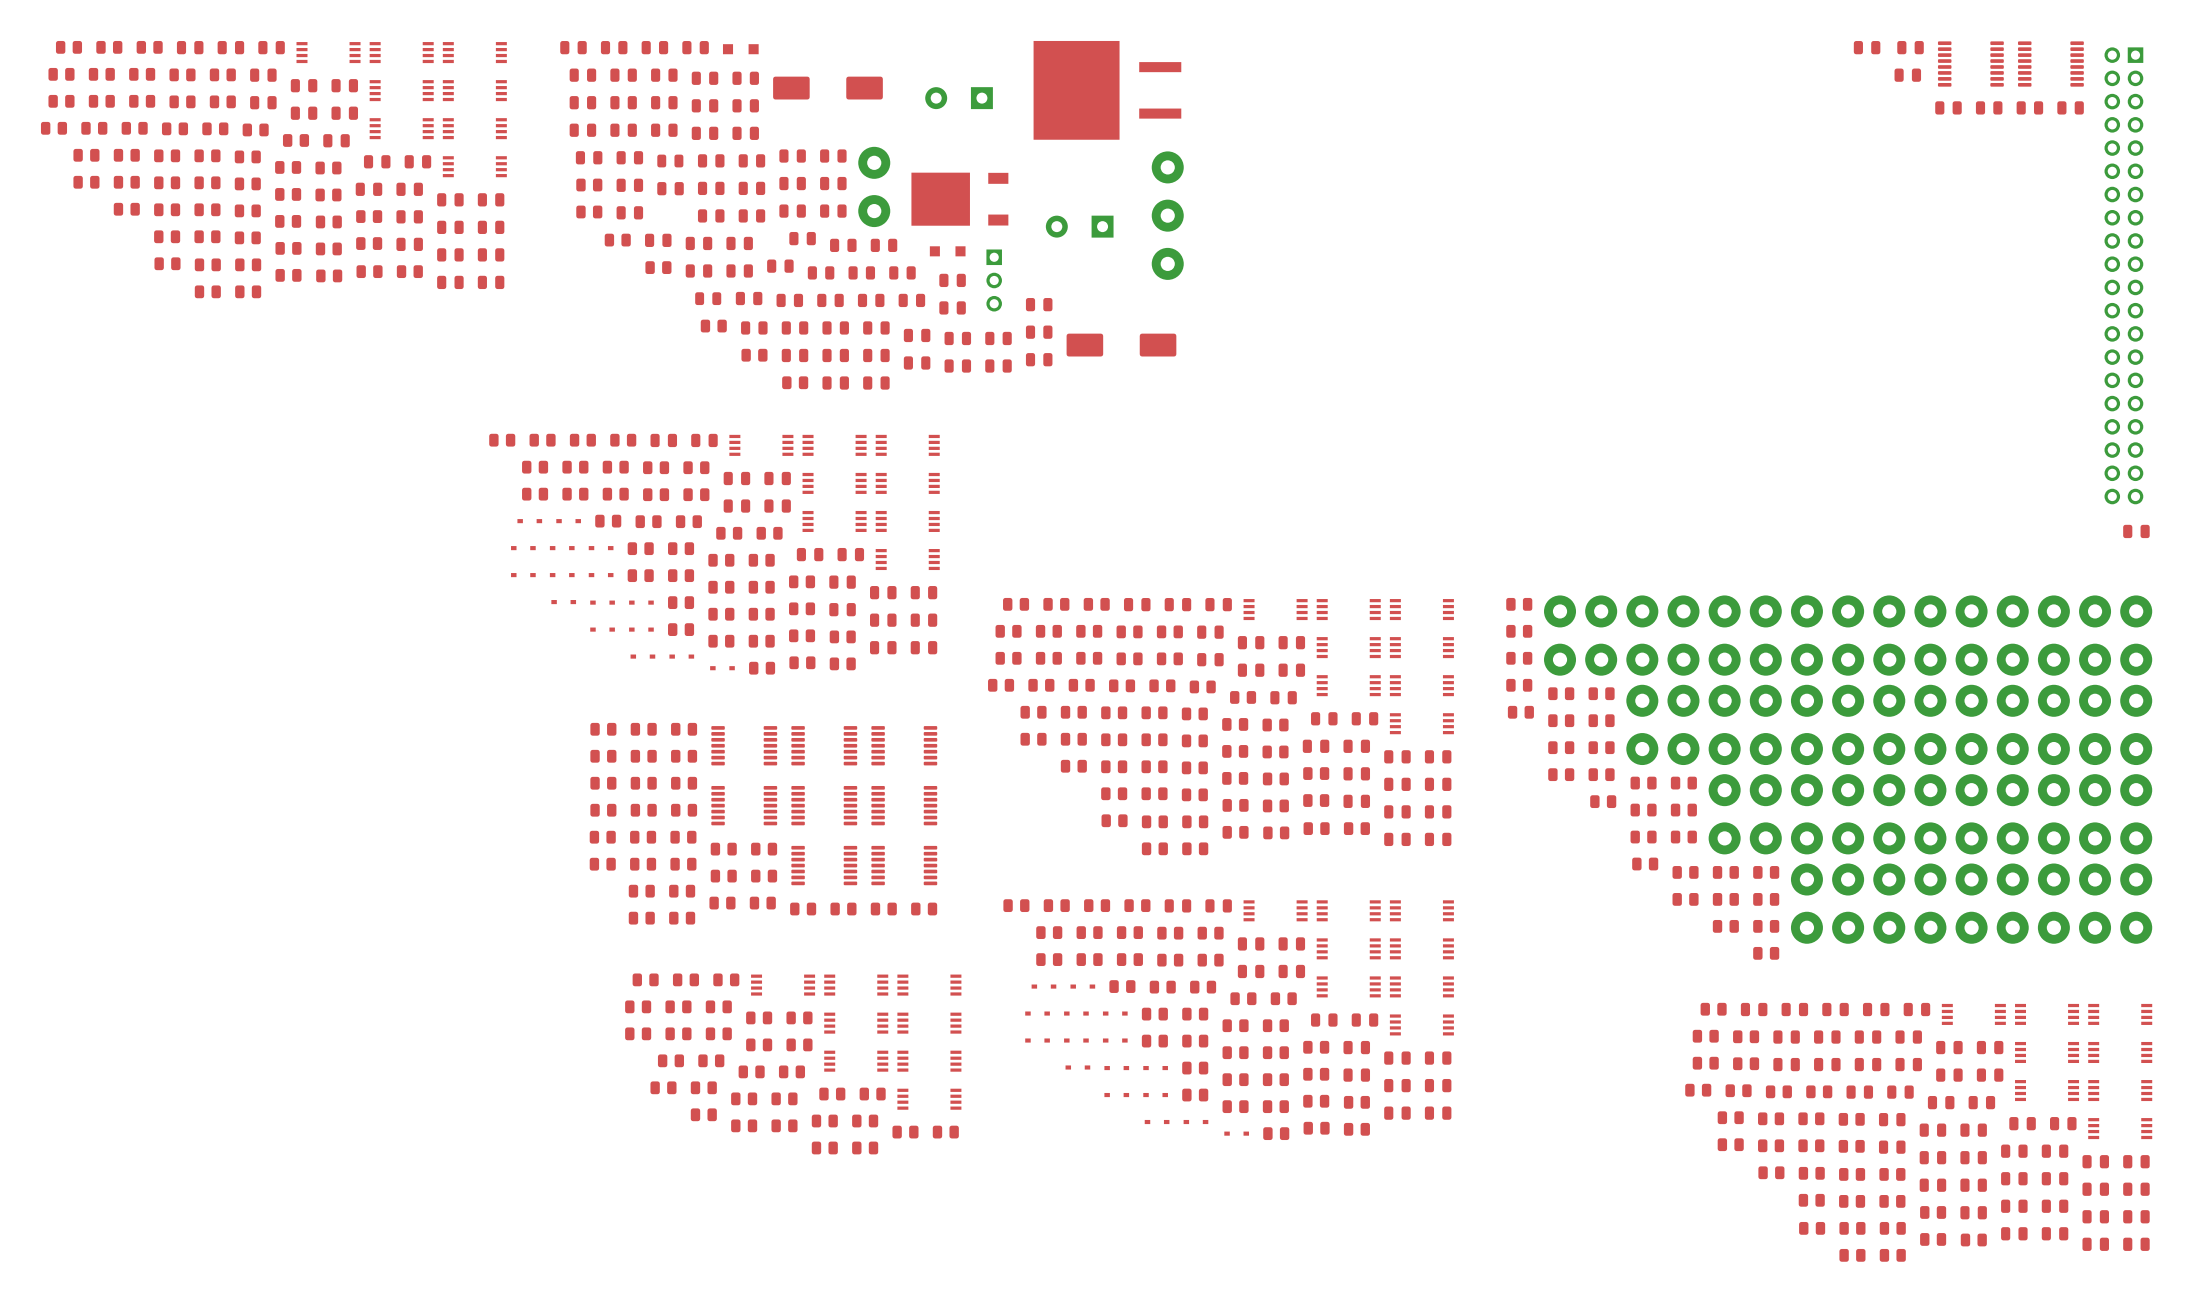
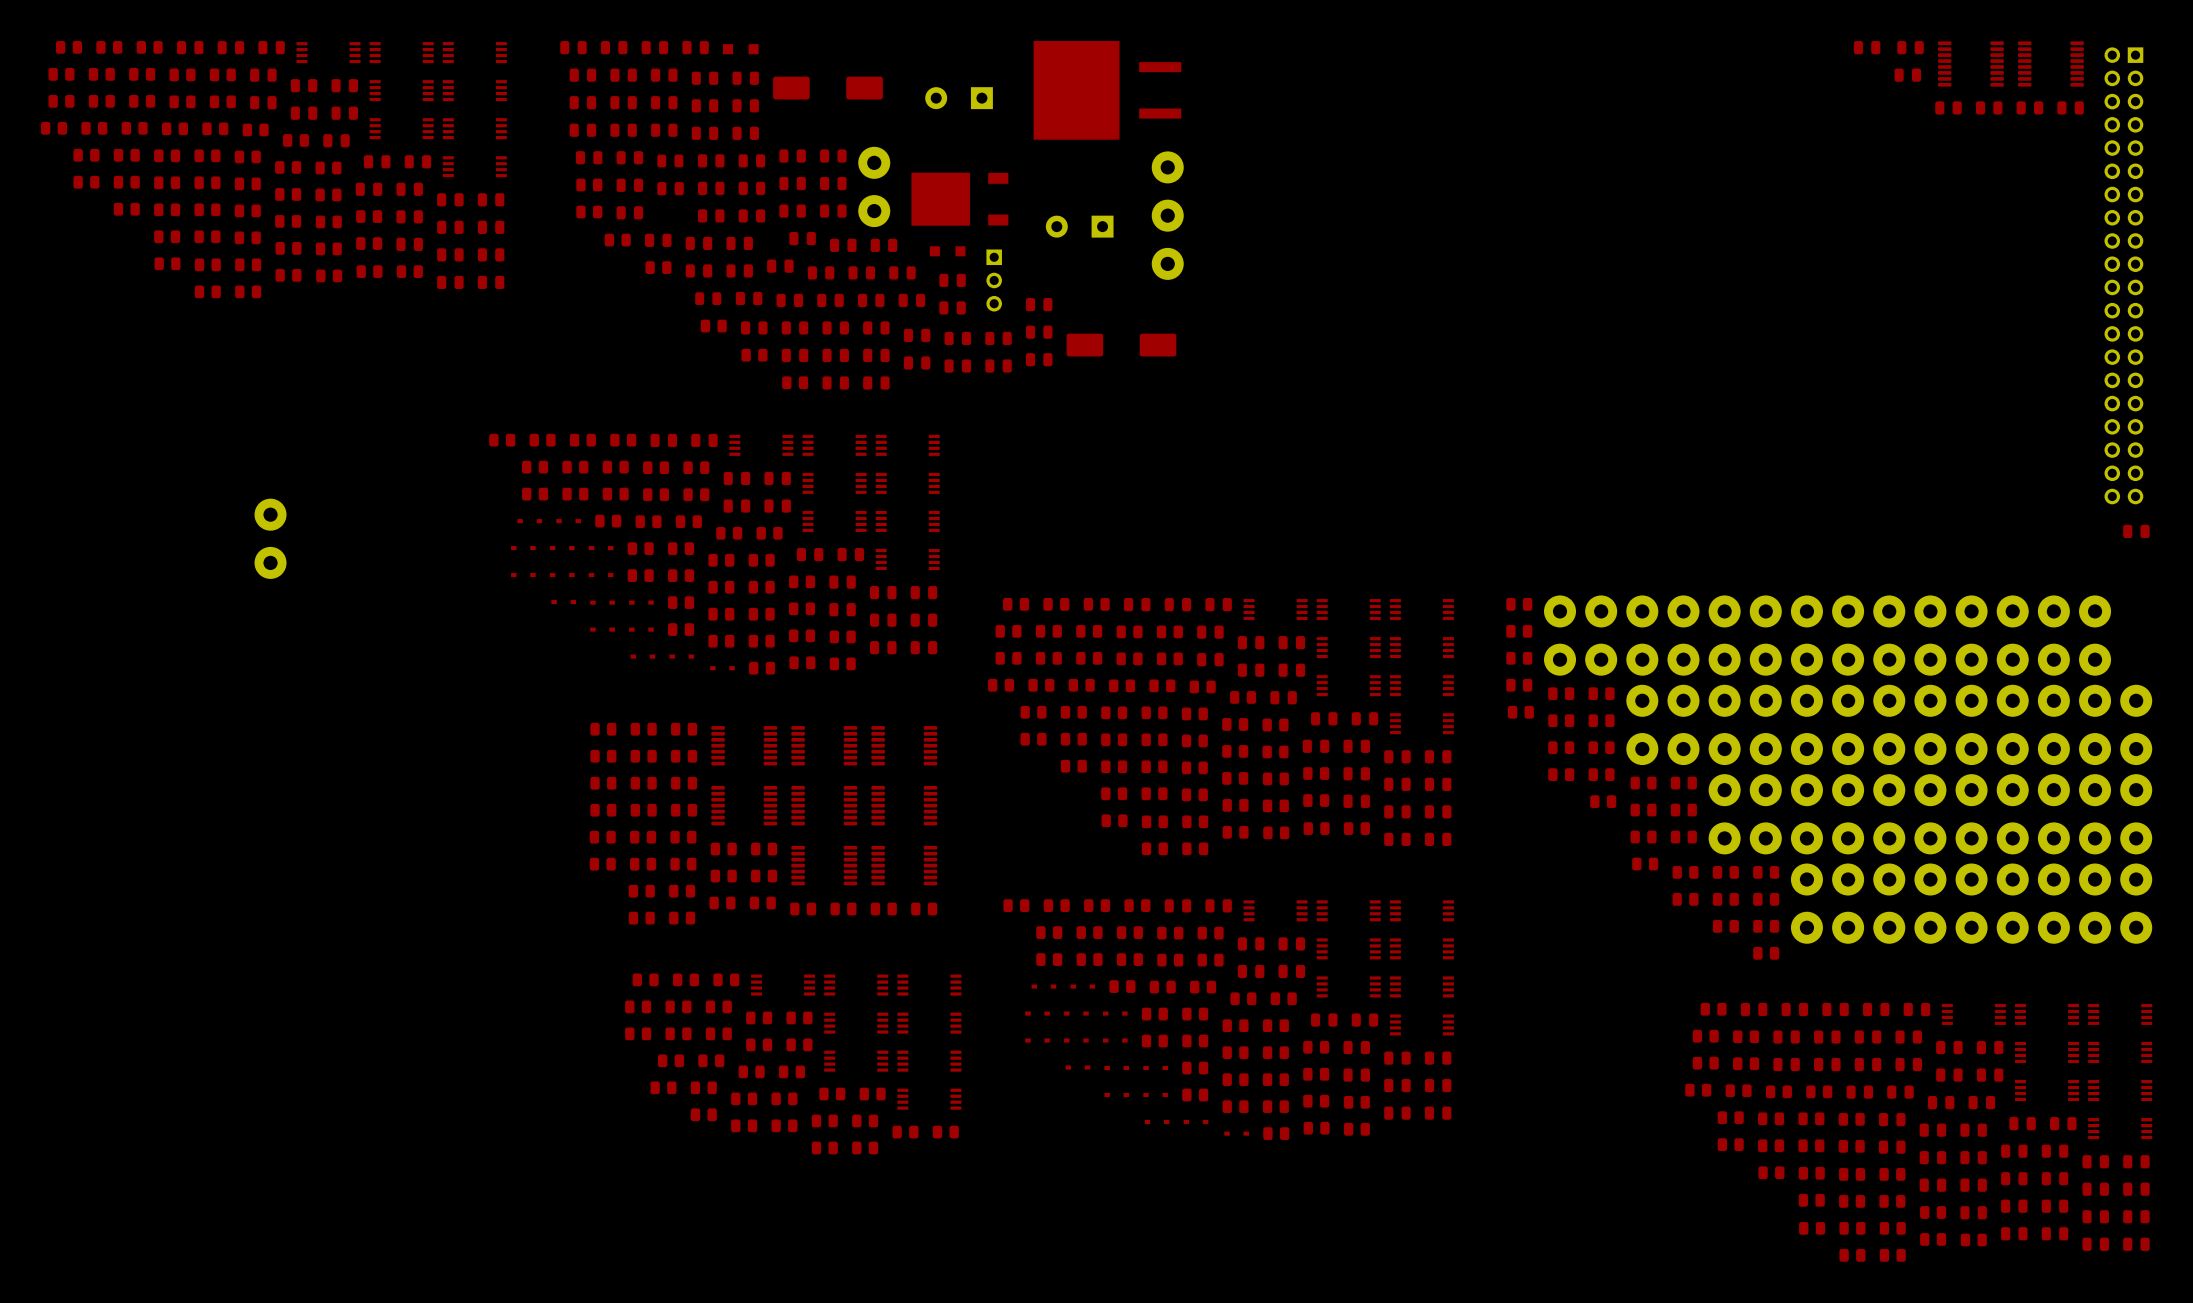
part: none -> (270, 538)
part: (2136, 635) -> none

